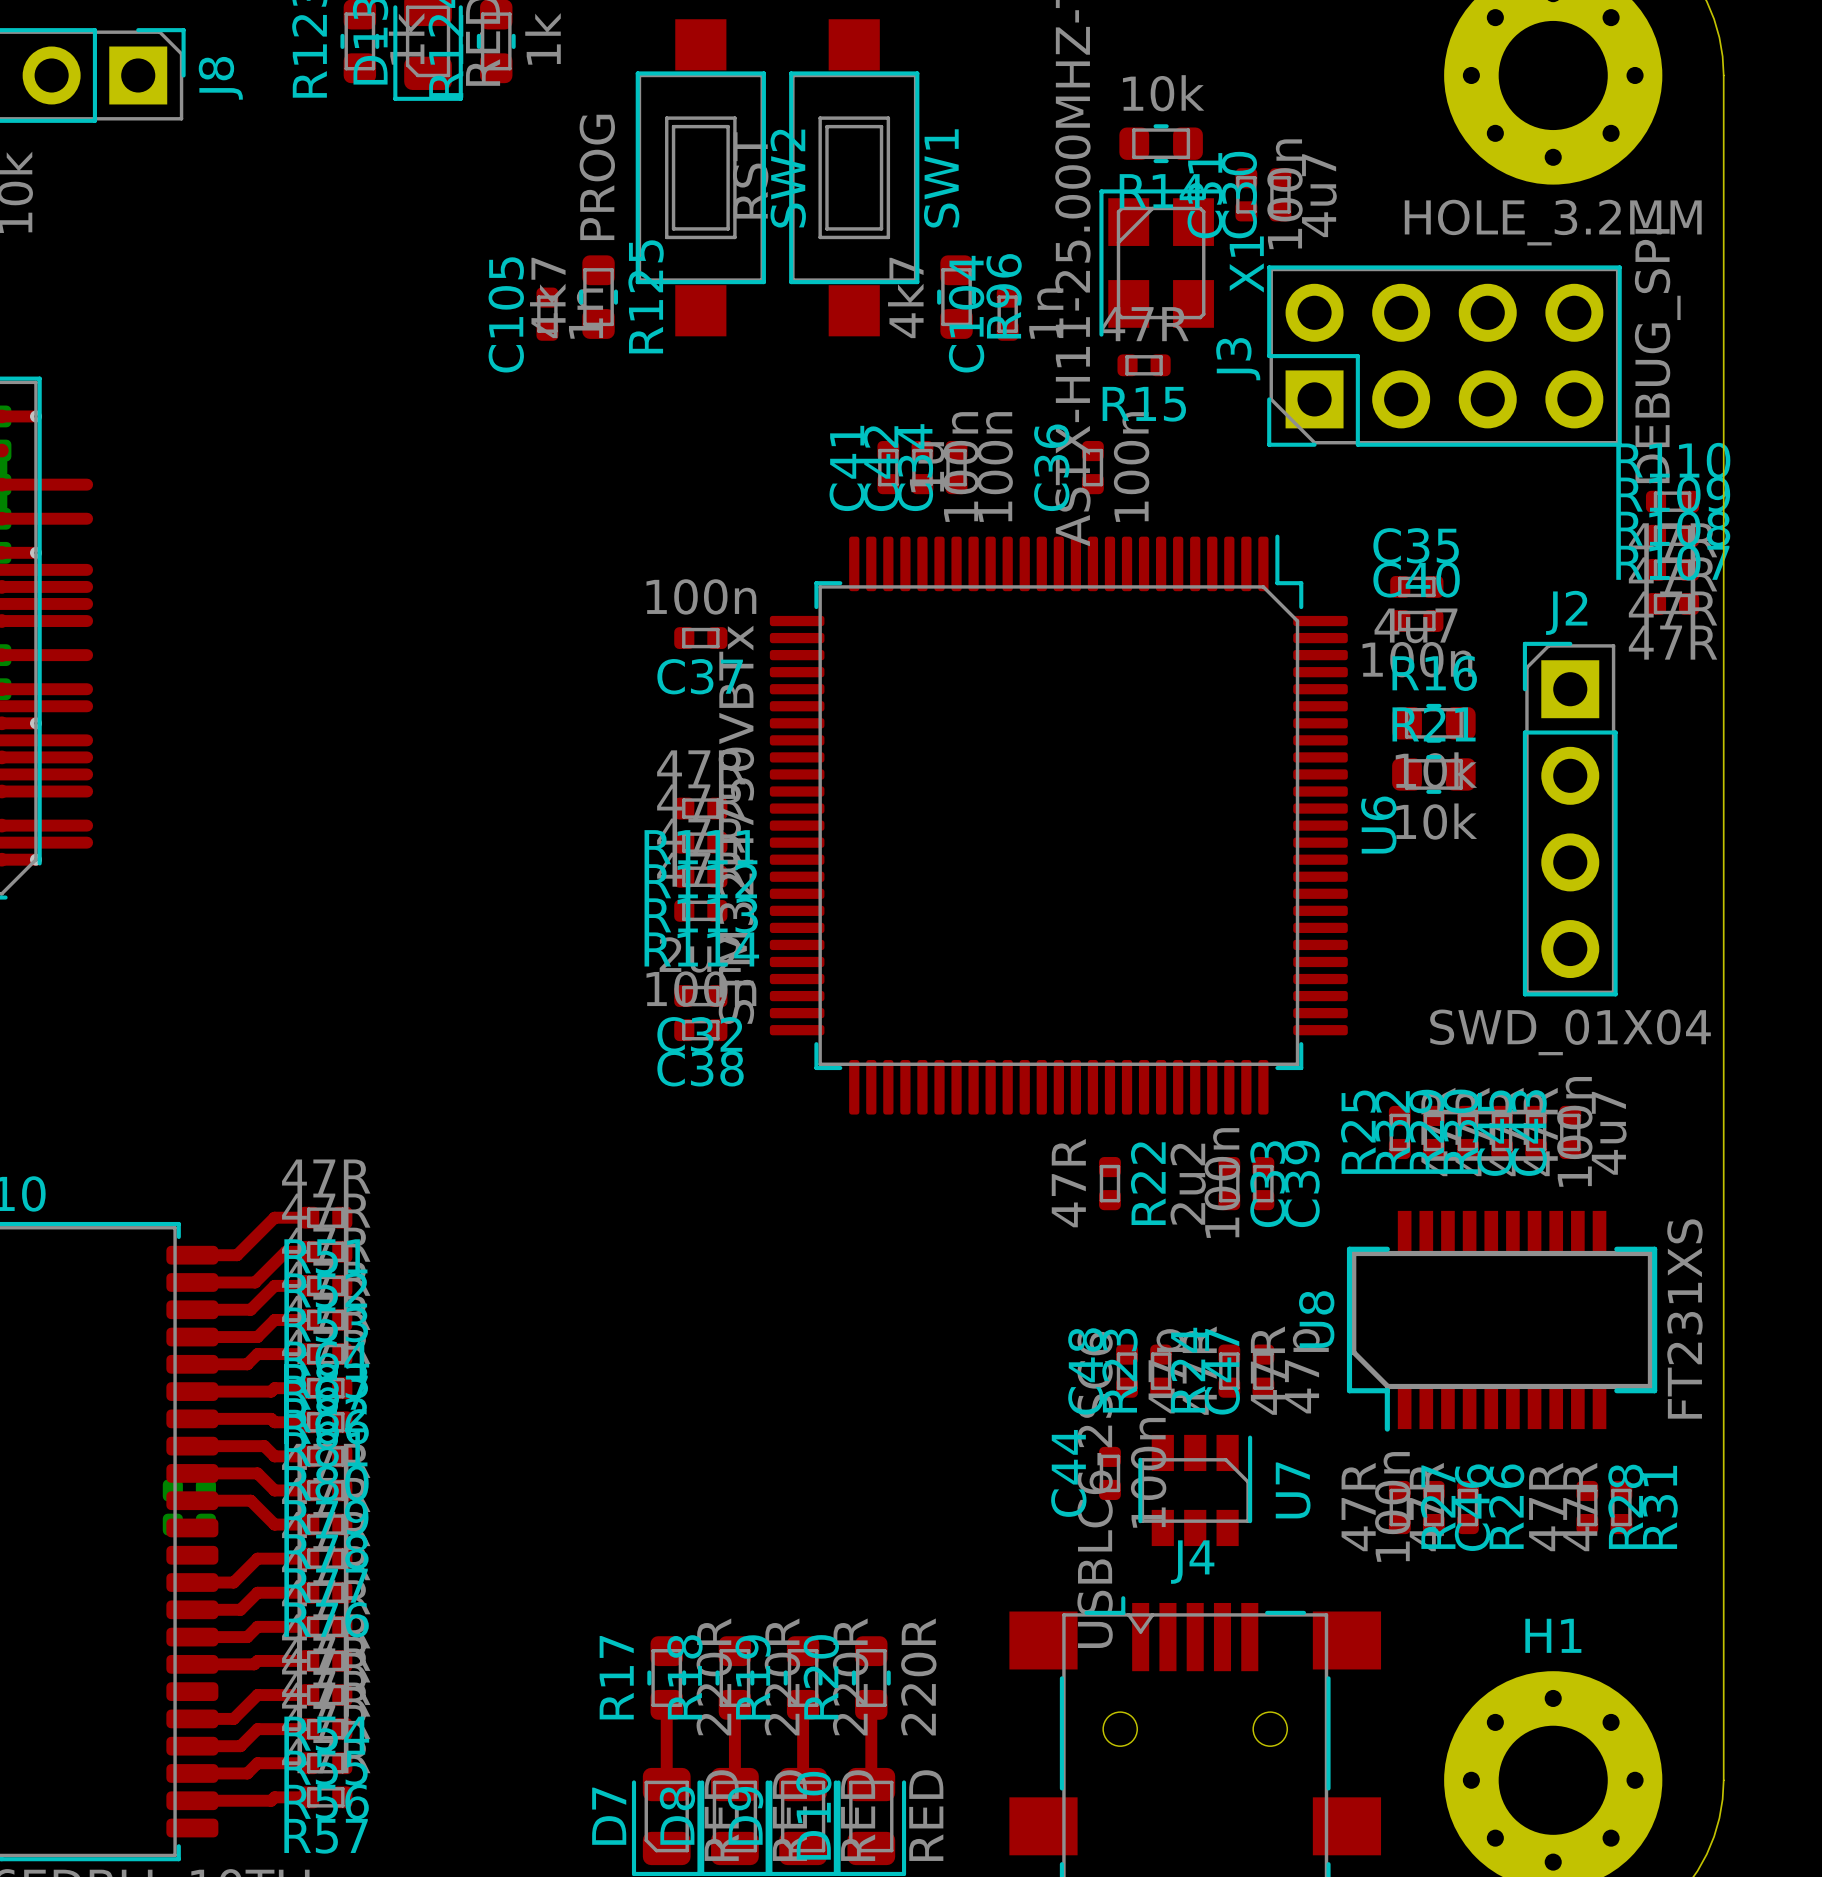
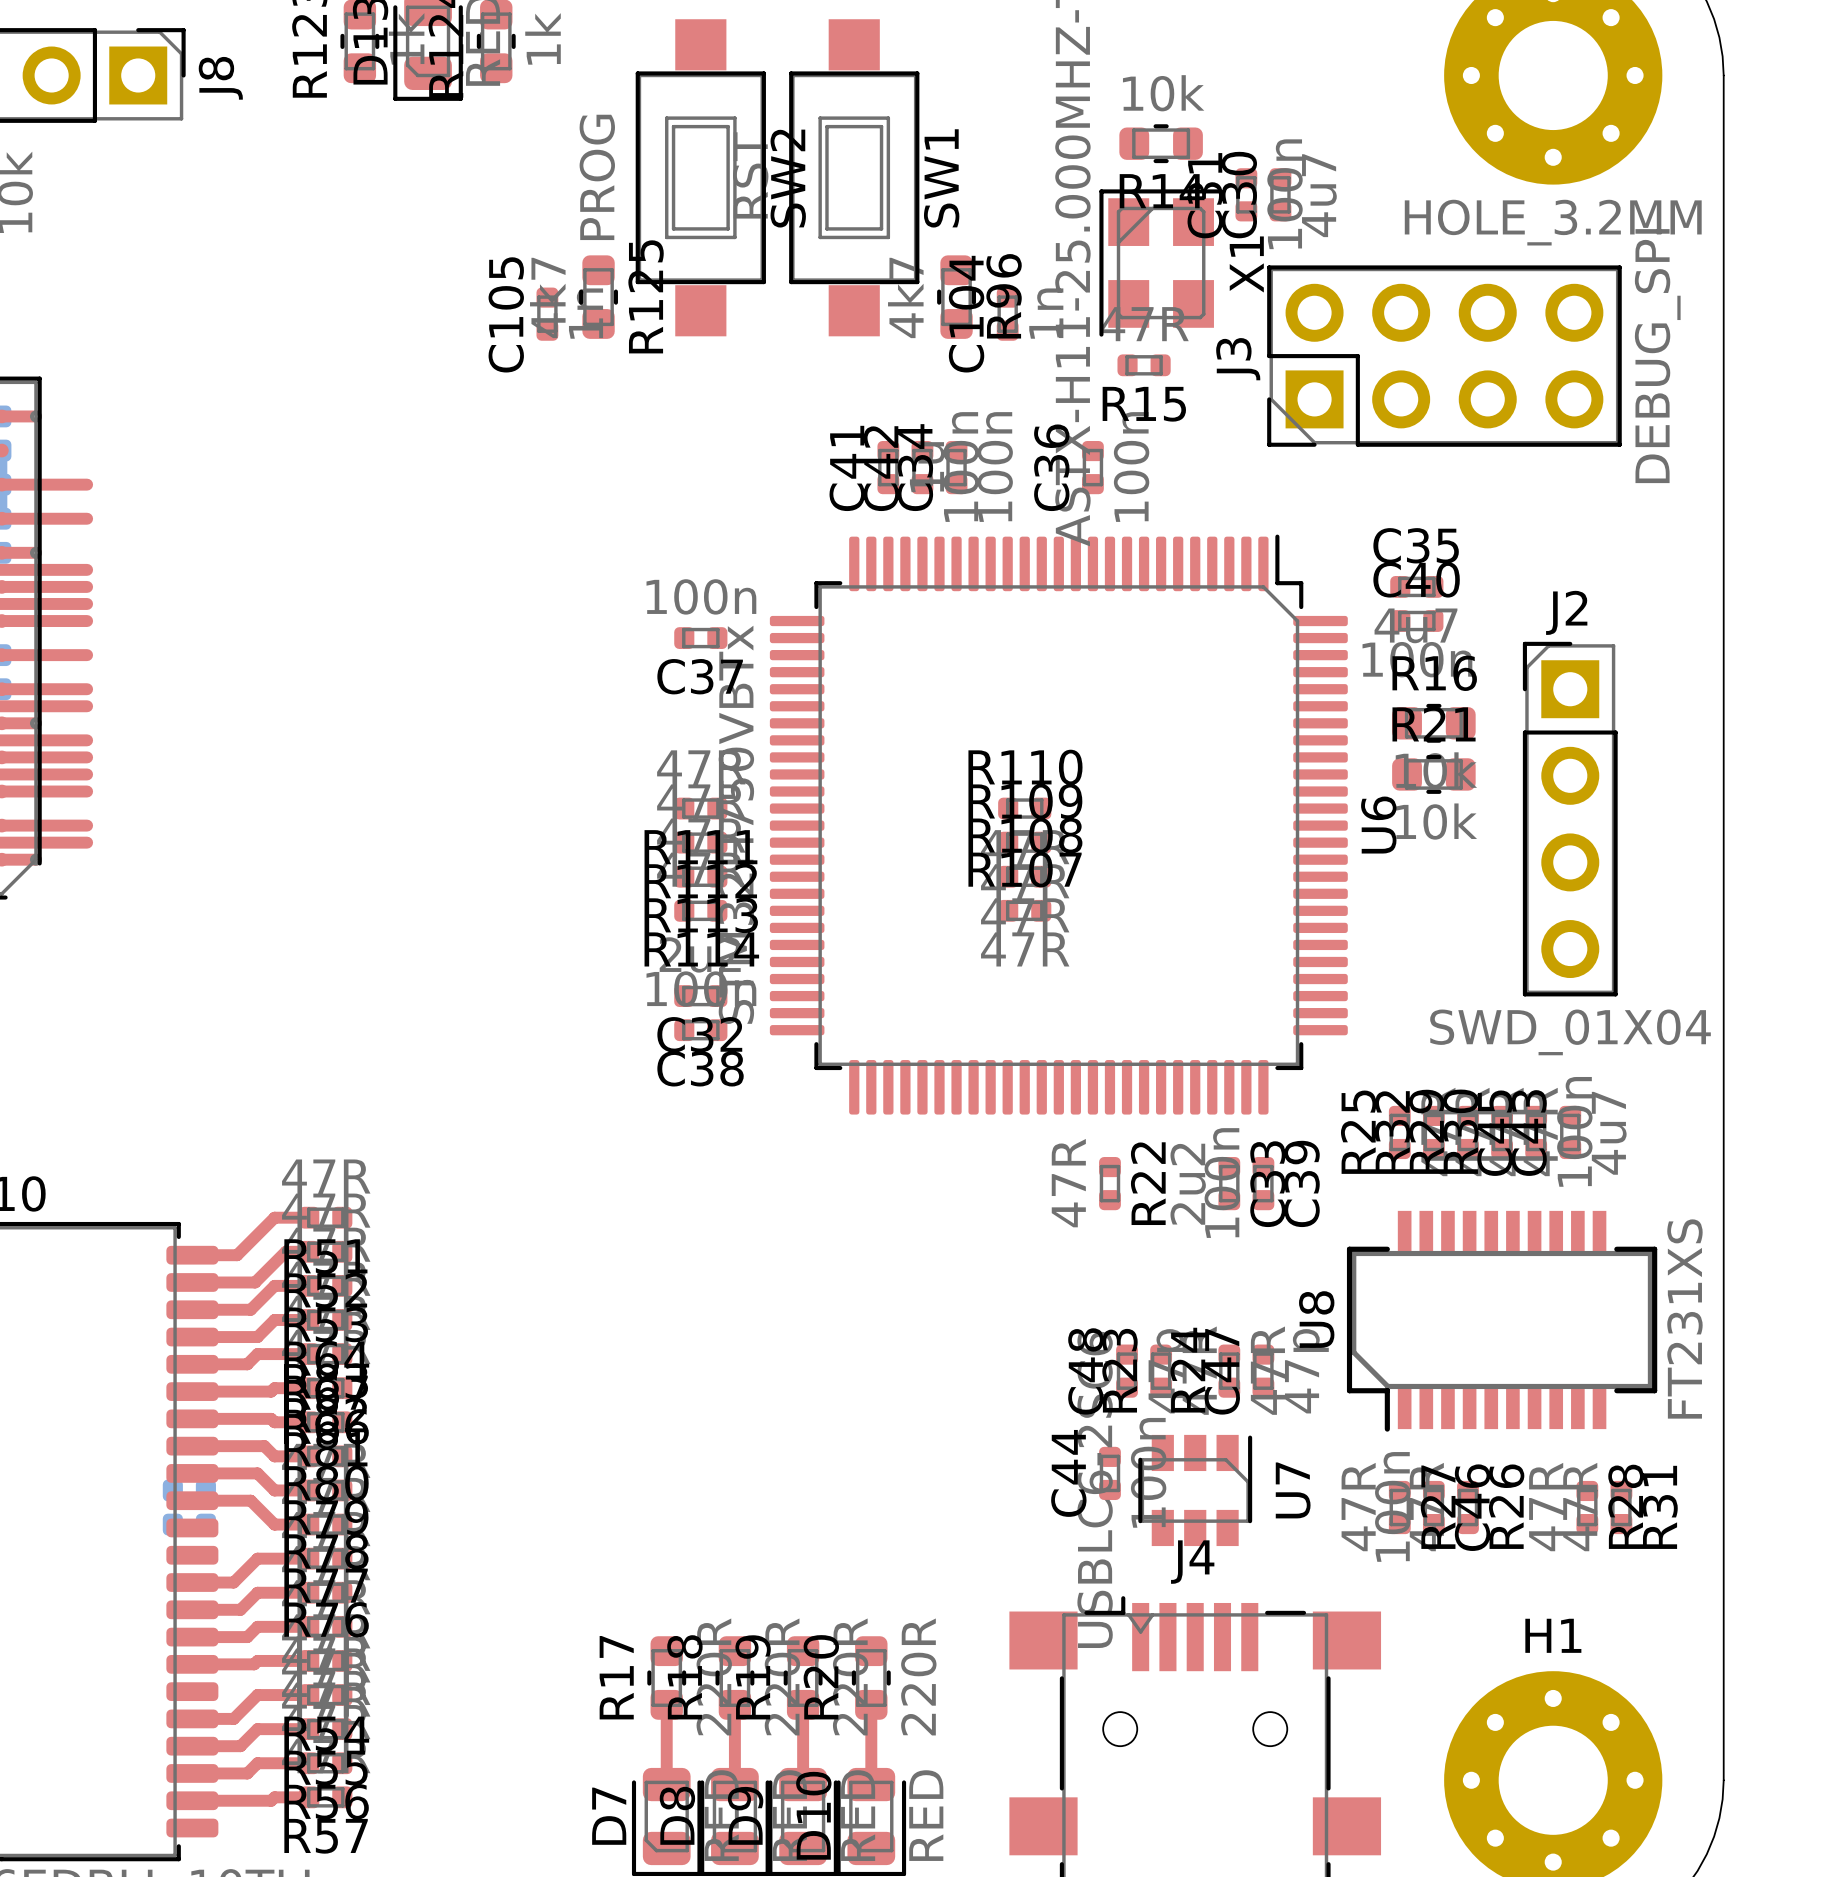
R110 position: (1672, 501) -> (1024, 808)
R109 position: (1672, 535) -> (1024, 842)
R108 position: (1672, 569) -> (1024, 876)
R107 position: (1672, 603) -> (1024, 910)

